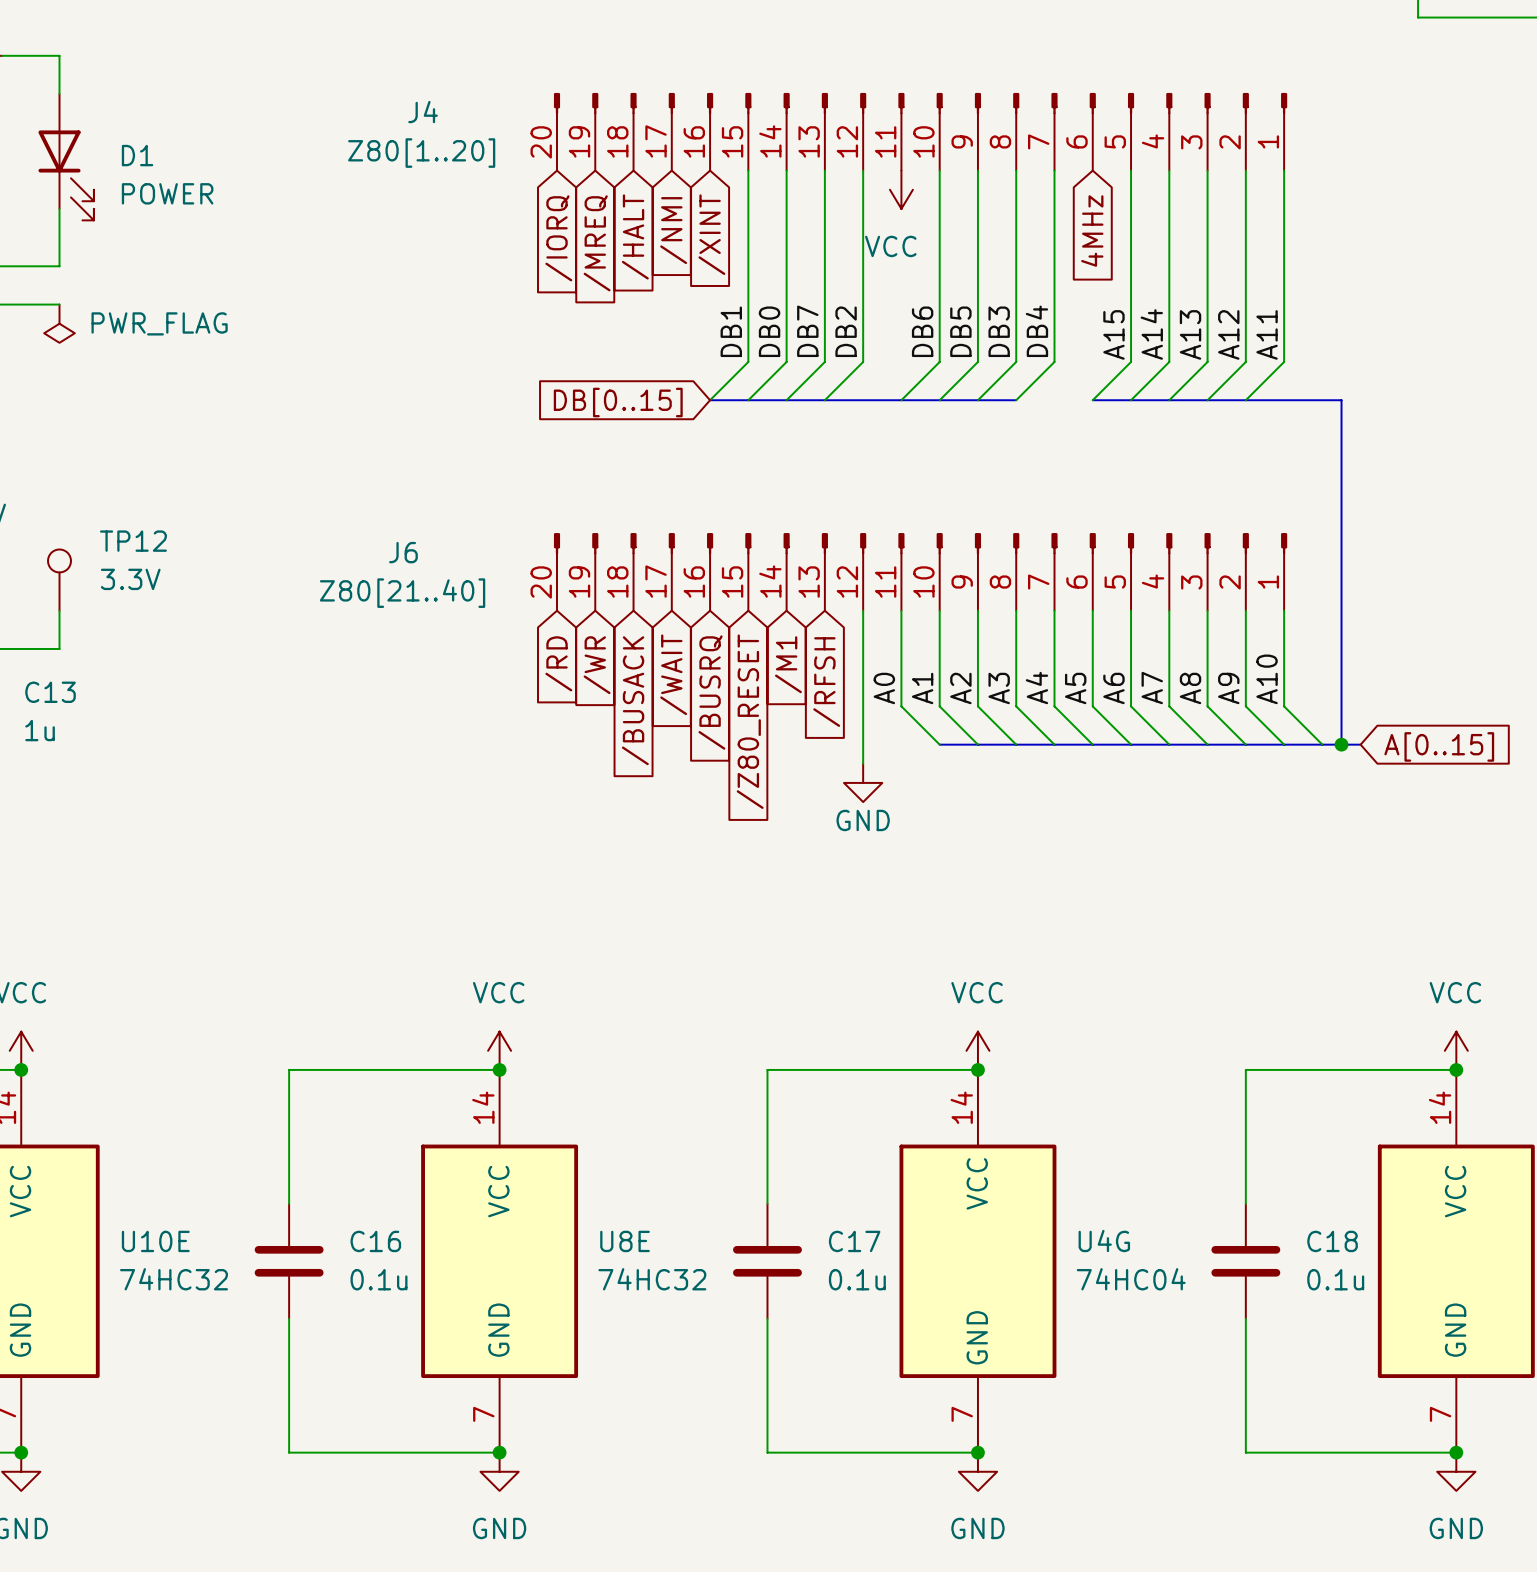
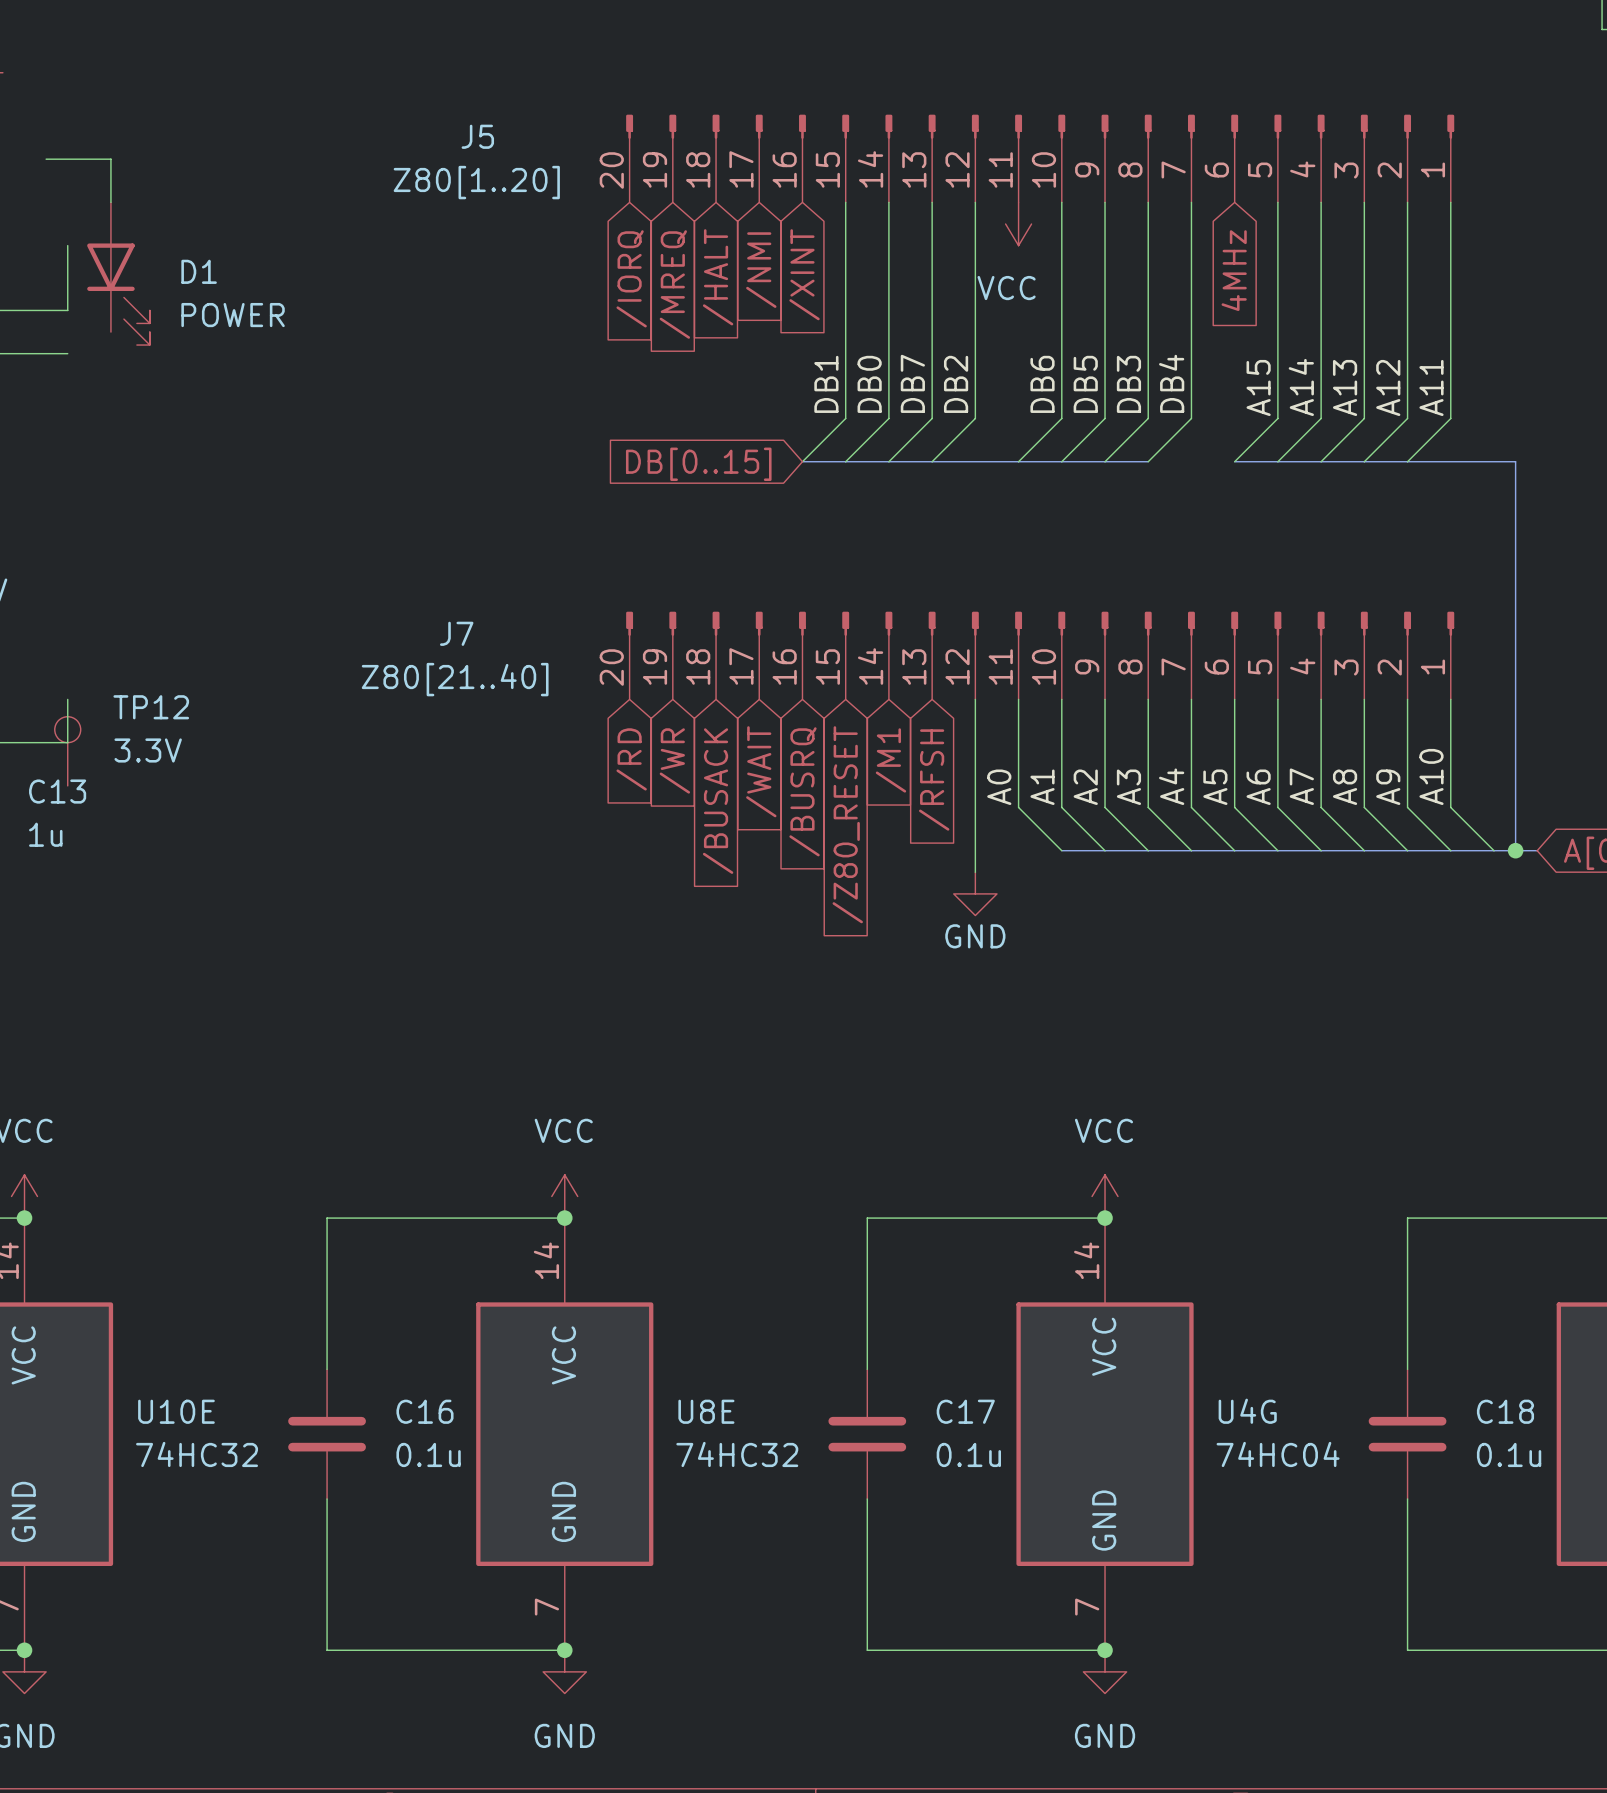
wire: (2, 55) (59, 55) (59, 94) -> (46, 159) (110, 159) (110, 202)
J4 name: J4 (423, 112) -> J5 (477, 136)
D1 position: (66, 157) -> (118, 273)
power symbol: PWR_FLAG (59, 323) -> none
J6 name: J6 (403, 552) -> J7 (456, 633)
TP12 position: (59, 580) -> (67, 751)

